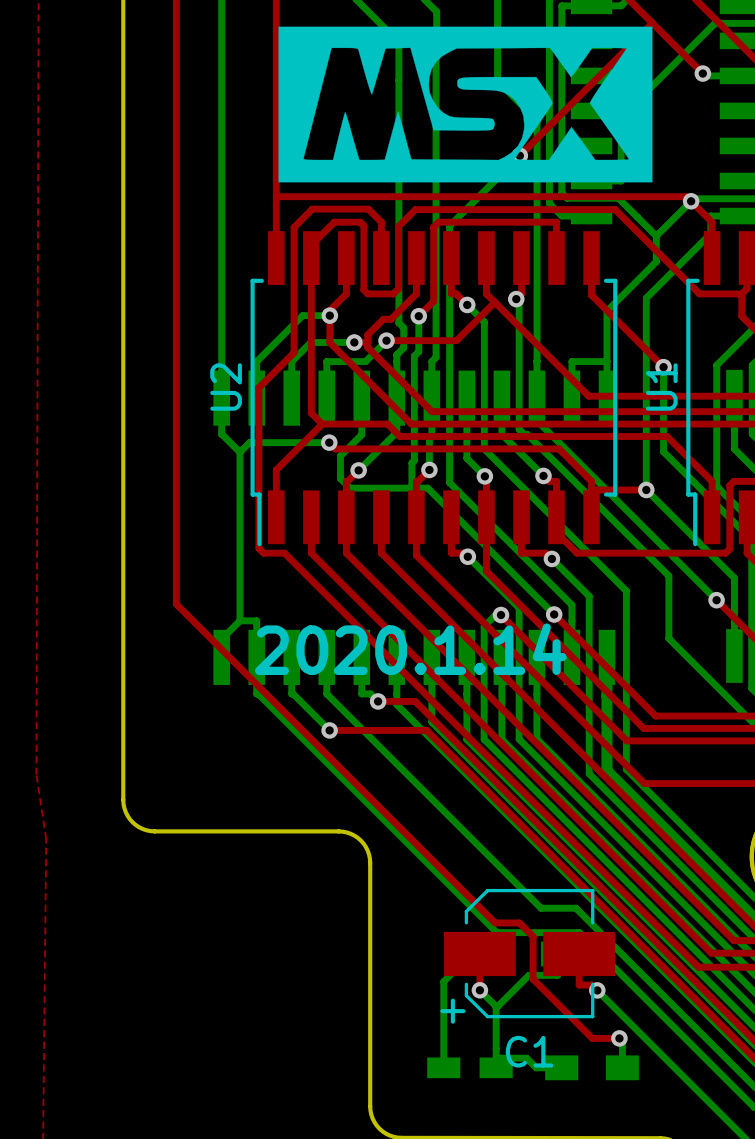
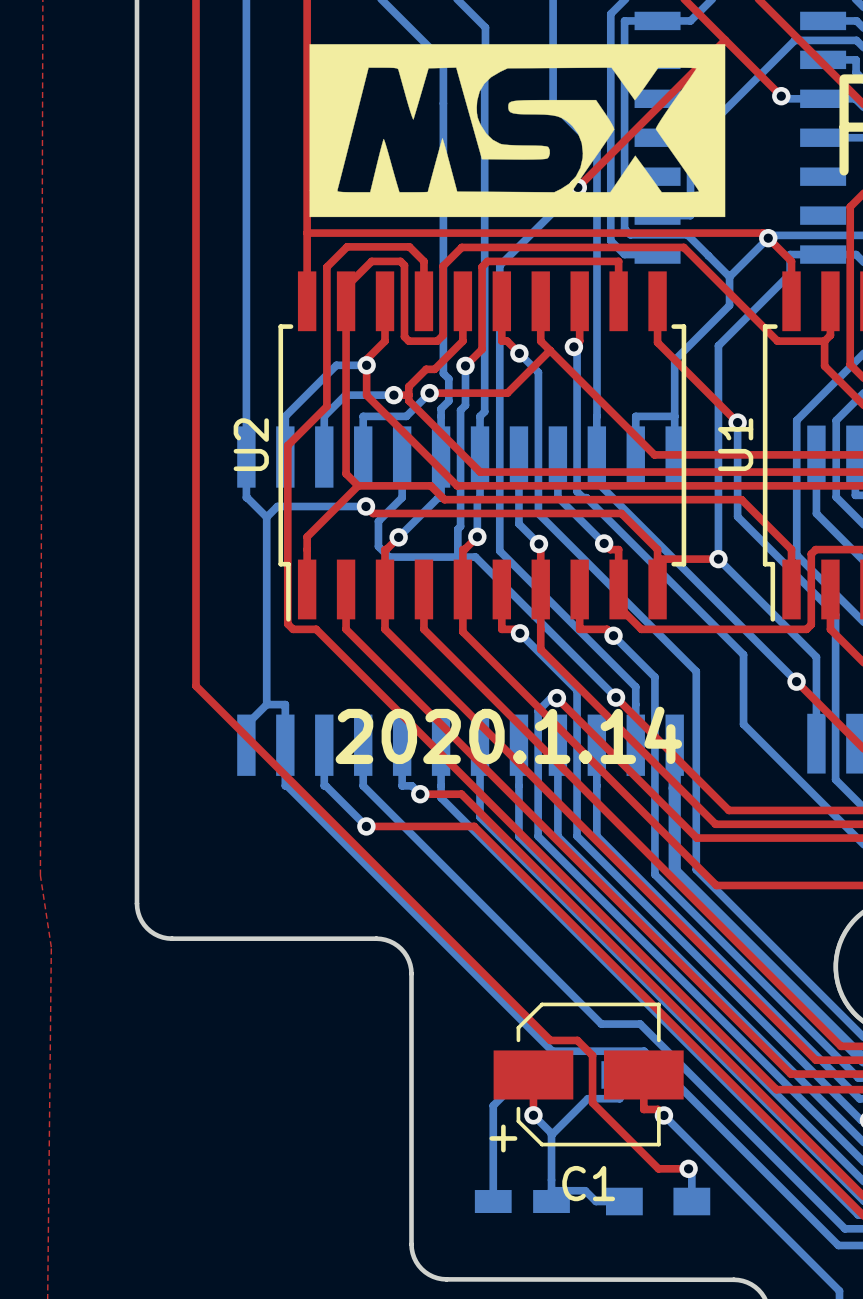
text position: 2020.1.14 (410, 649) -> 2020.1.14 (508, 735)

